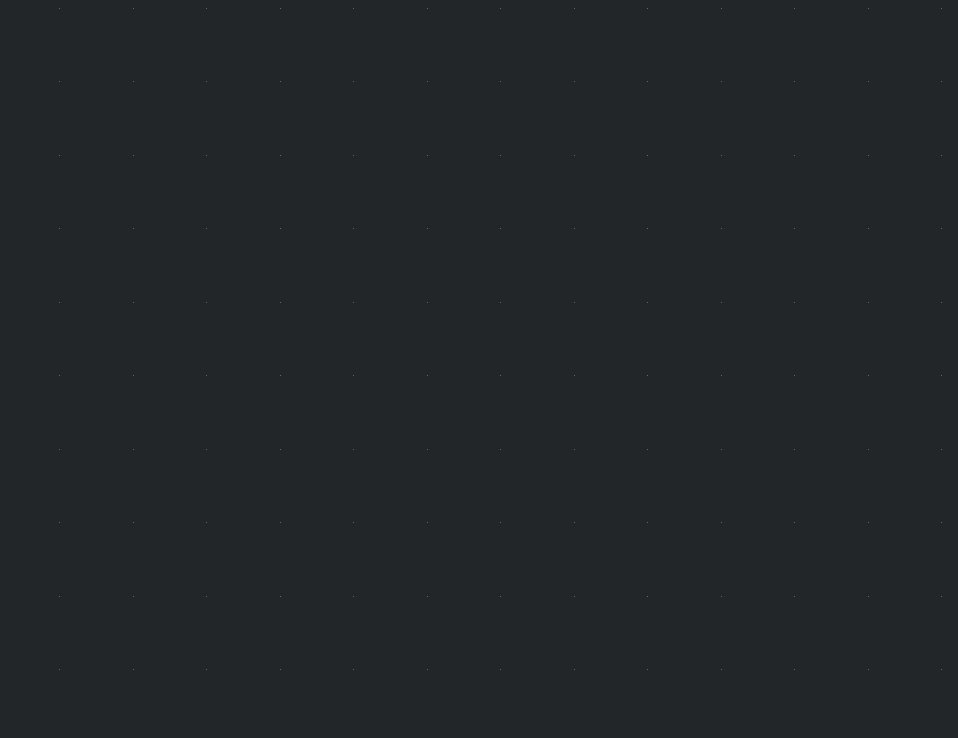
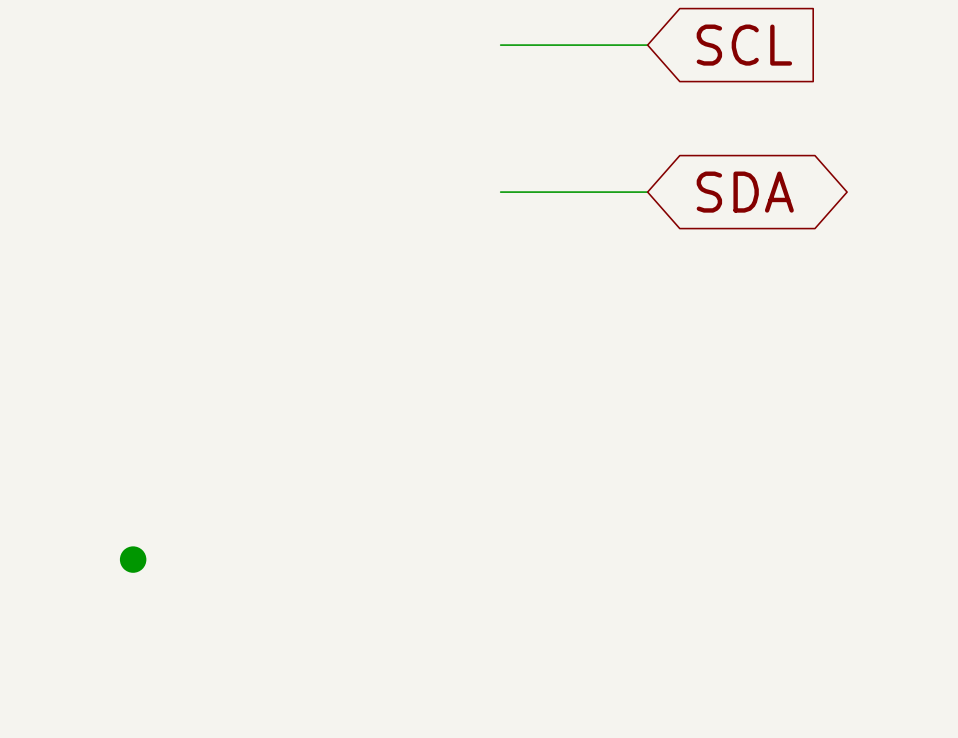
wire: none -> (500, 45) (647, 45)
global label: none -> SCL (744, 45)
wire: none -> (500, 192) (647, 192)
global label: none -> SDA (745, 192)
junction: none -> (133, 559)

